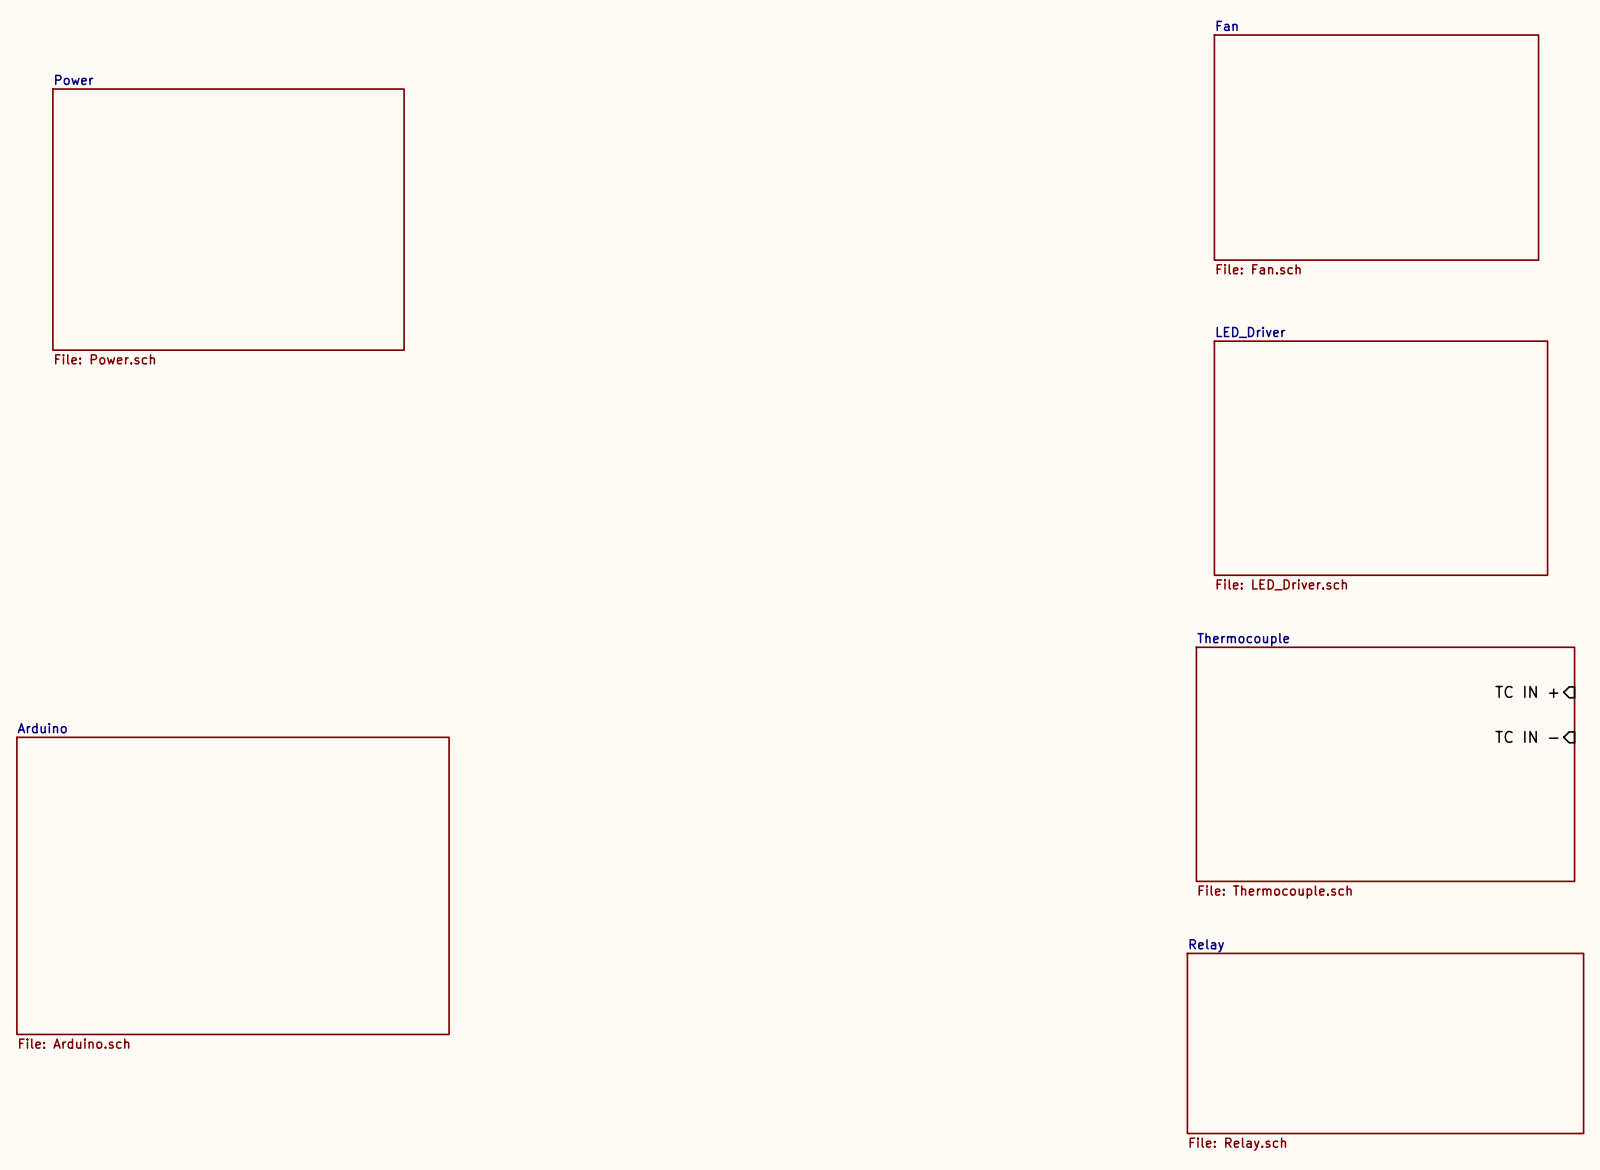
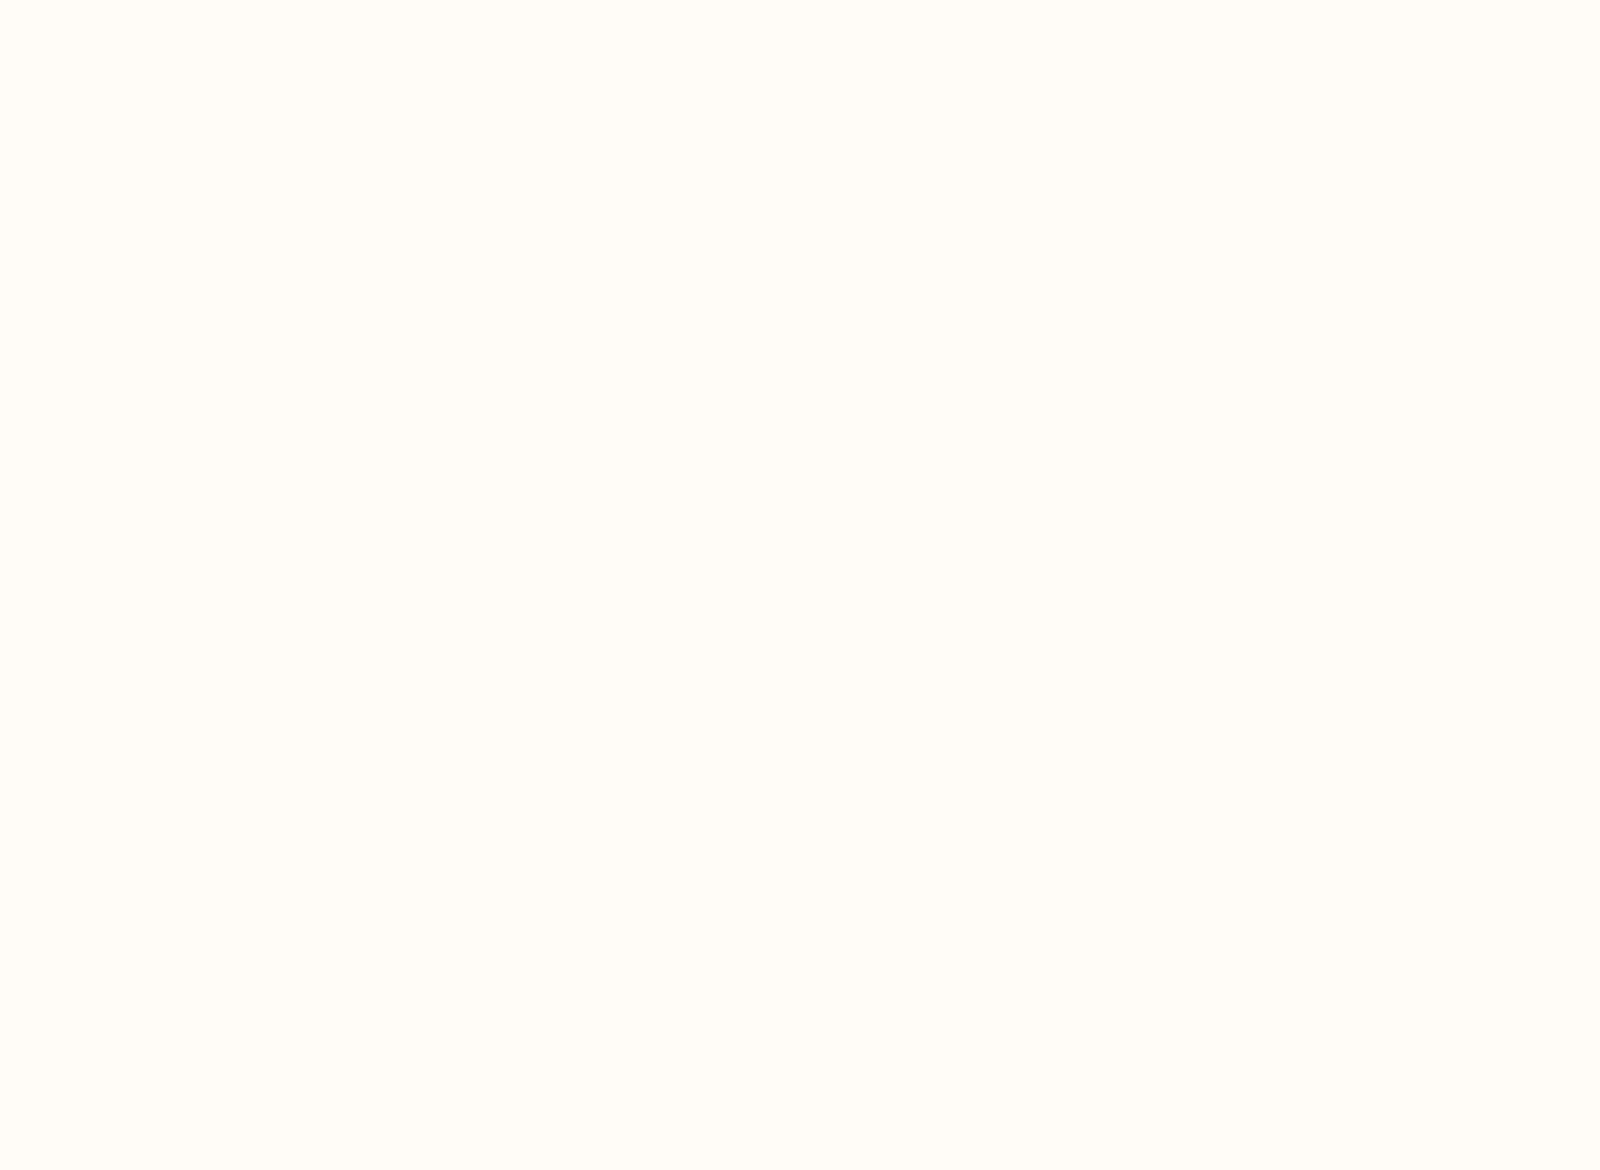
sheet Fan: File: Fan.sch (1376, 147) -> none
sheet Power: File: Power.sch (228, 219) -> none
sheet LED_Driver: File: LED_Driver.sch (1380, 458) -> none
sheet pin: TC IN + (1526, 691) -> none
sheet pin: TC IN - (1526, 736) -> none
sheet Thermocouple: File: Thermocouple.sch (1385, 764) -> none
sheet Arduino: File: Arduino.sch (232, 885) -> none
sheet Relay: File: Relay.sch (1385, 1043) -> none

